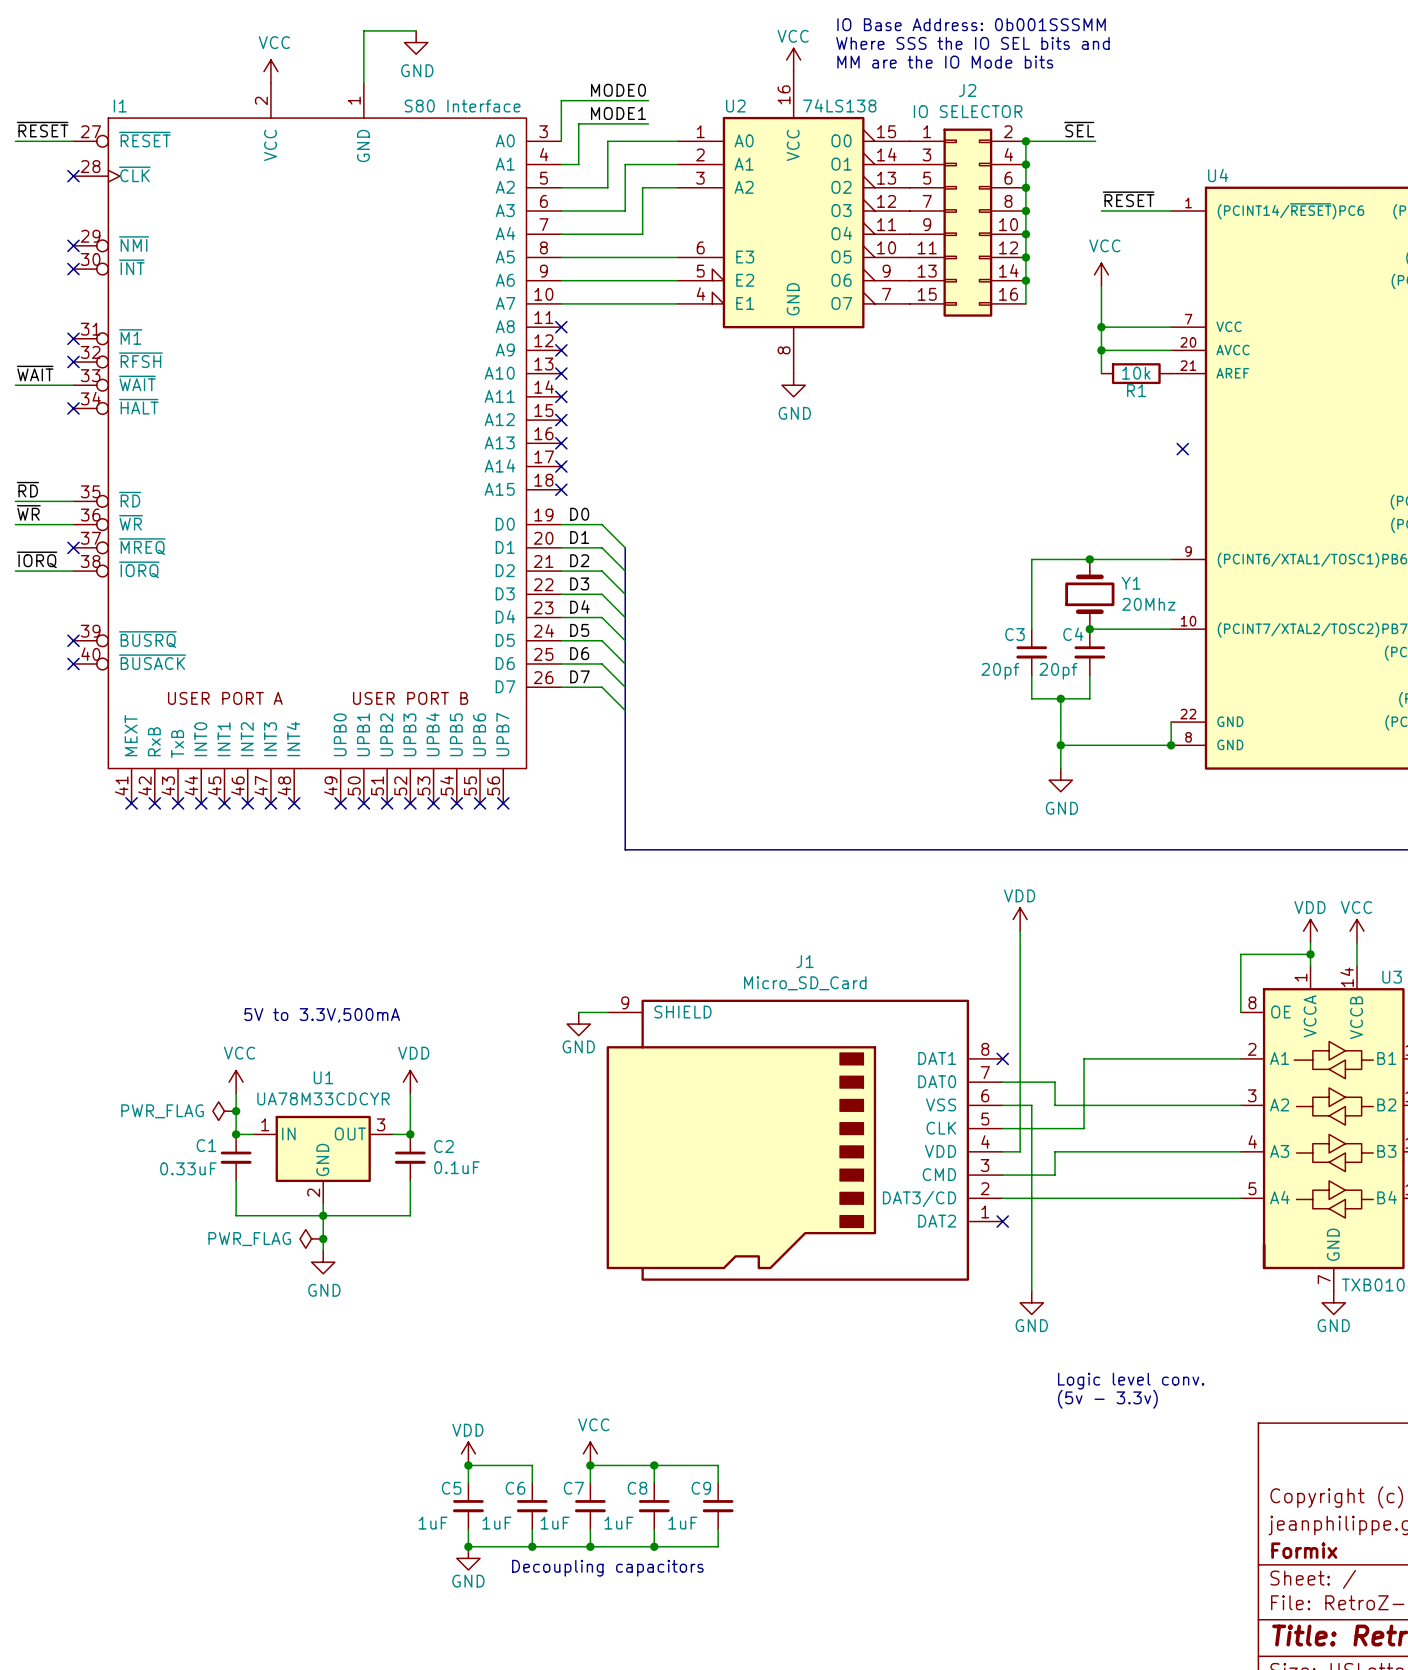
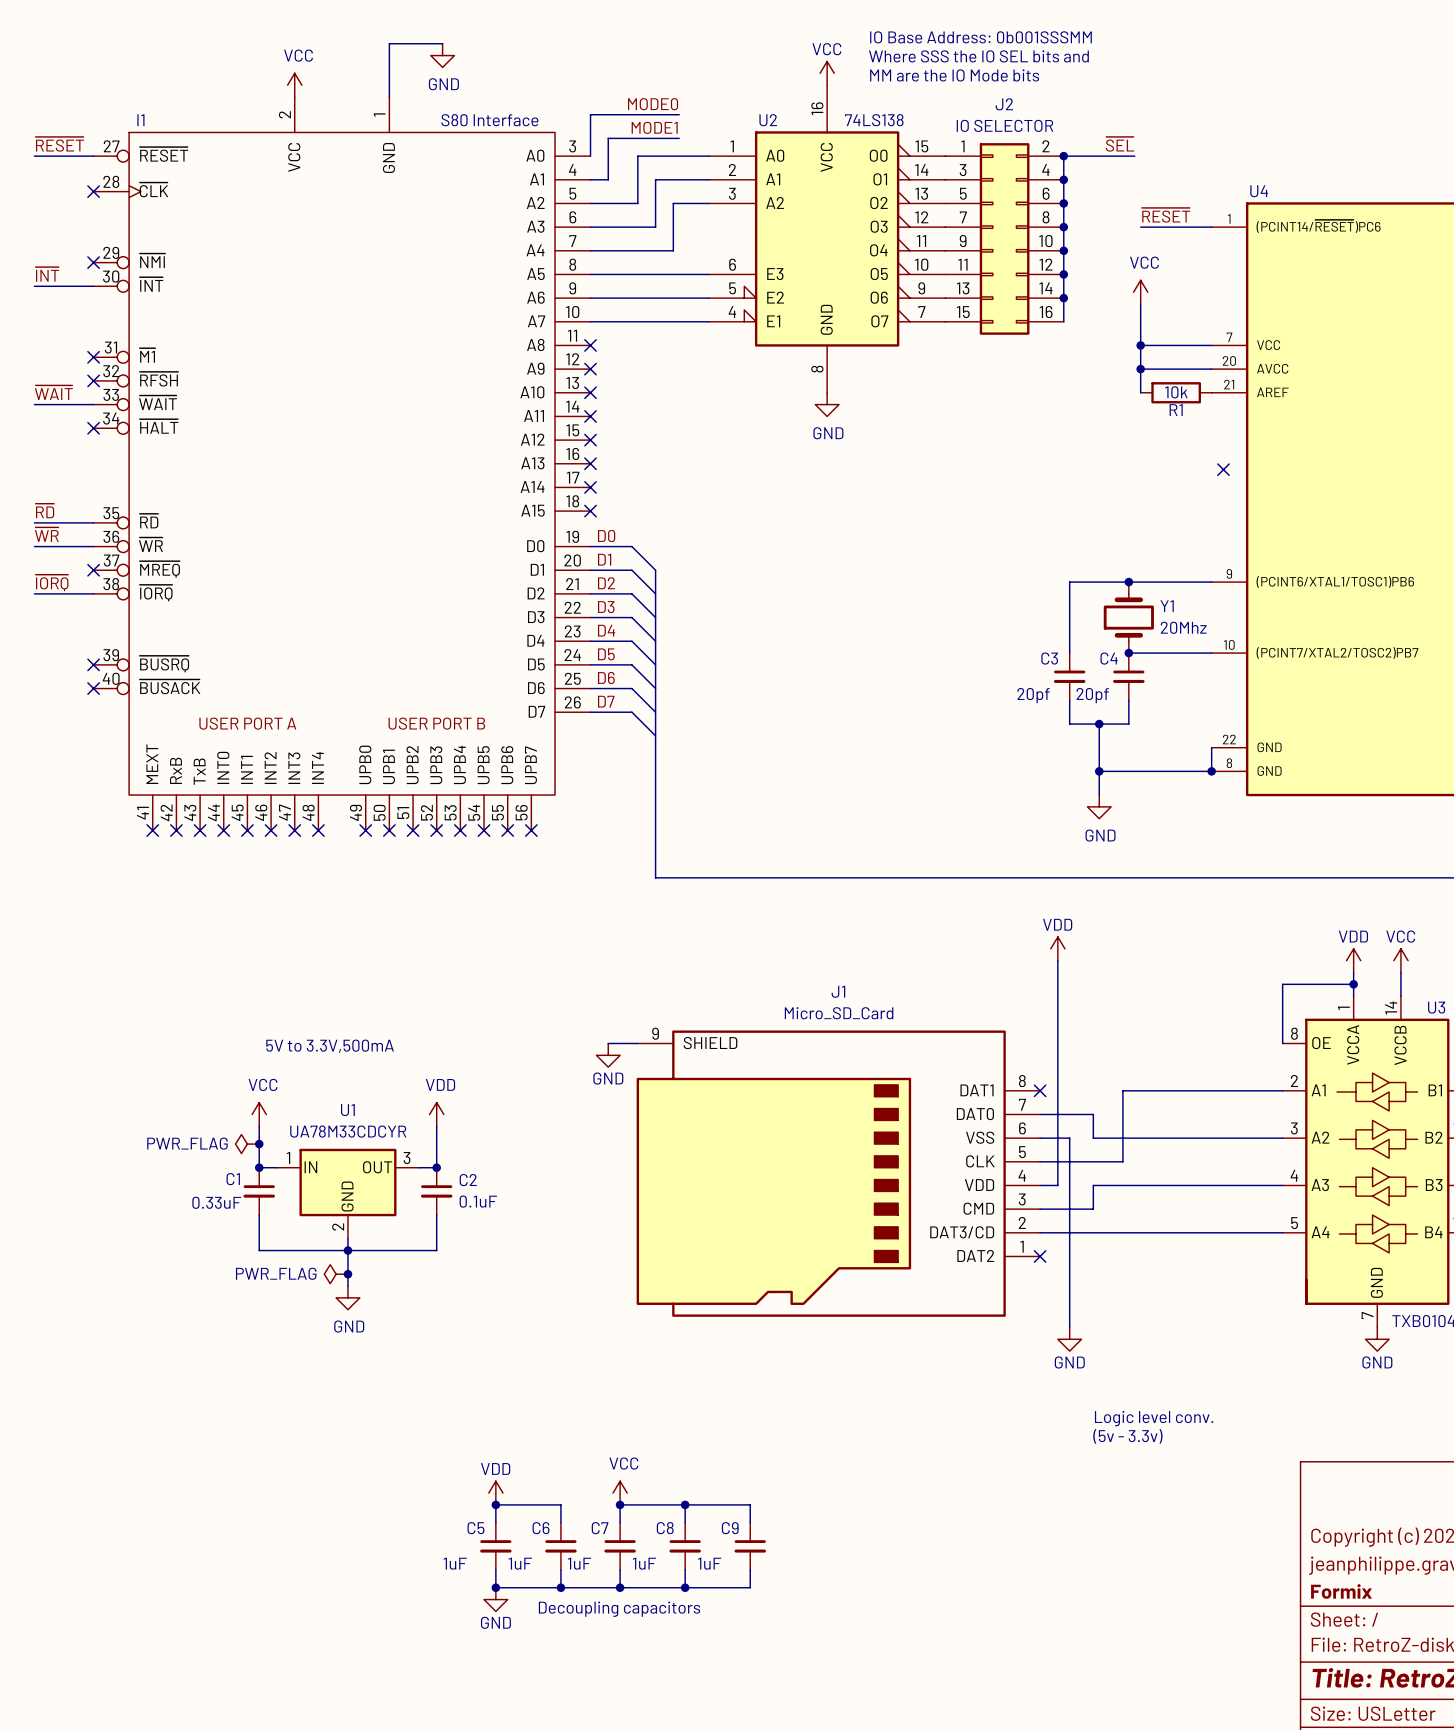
label: none -> ~{INT} (47, 274)
wire: none -> (34, 286) (93, 286)
no-connect mark: (73, 269) -> none

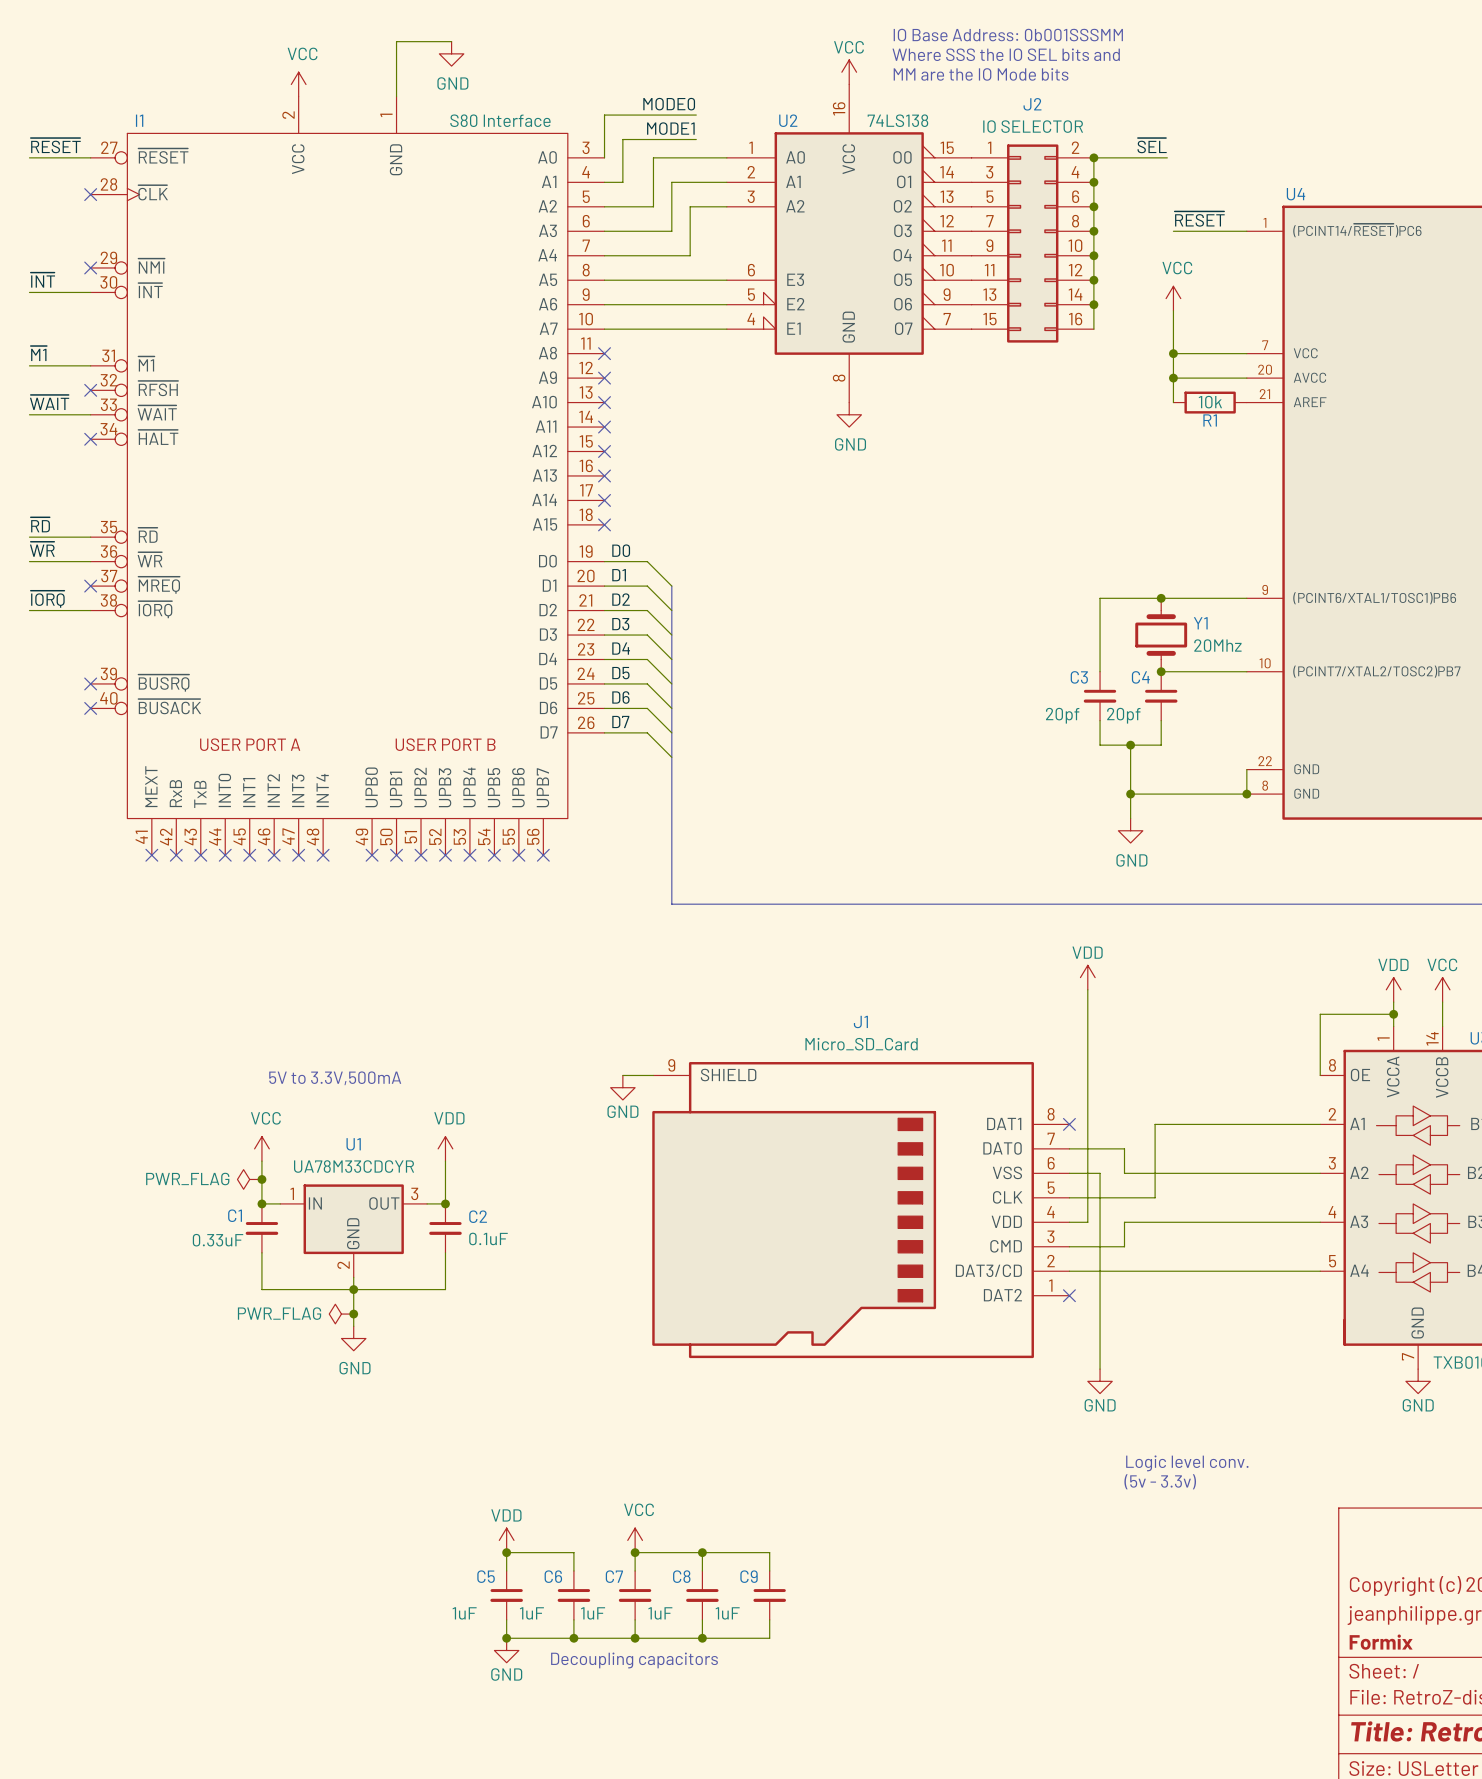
label: none -> ~{M1} (38, 353)
wire: none -> (29, 365) (90, 365)
no-connect mark: (93, 357) -> none
no-connect mark: (1223, 469) -> none

